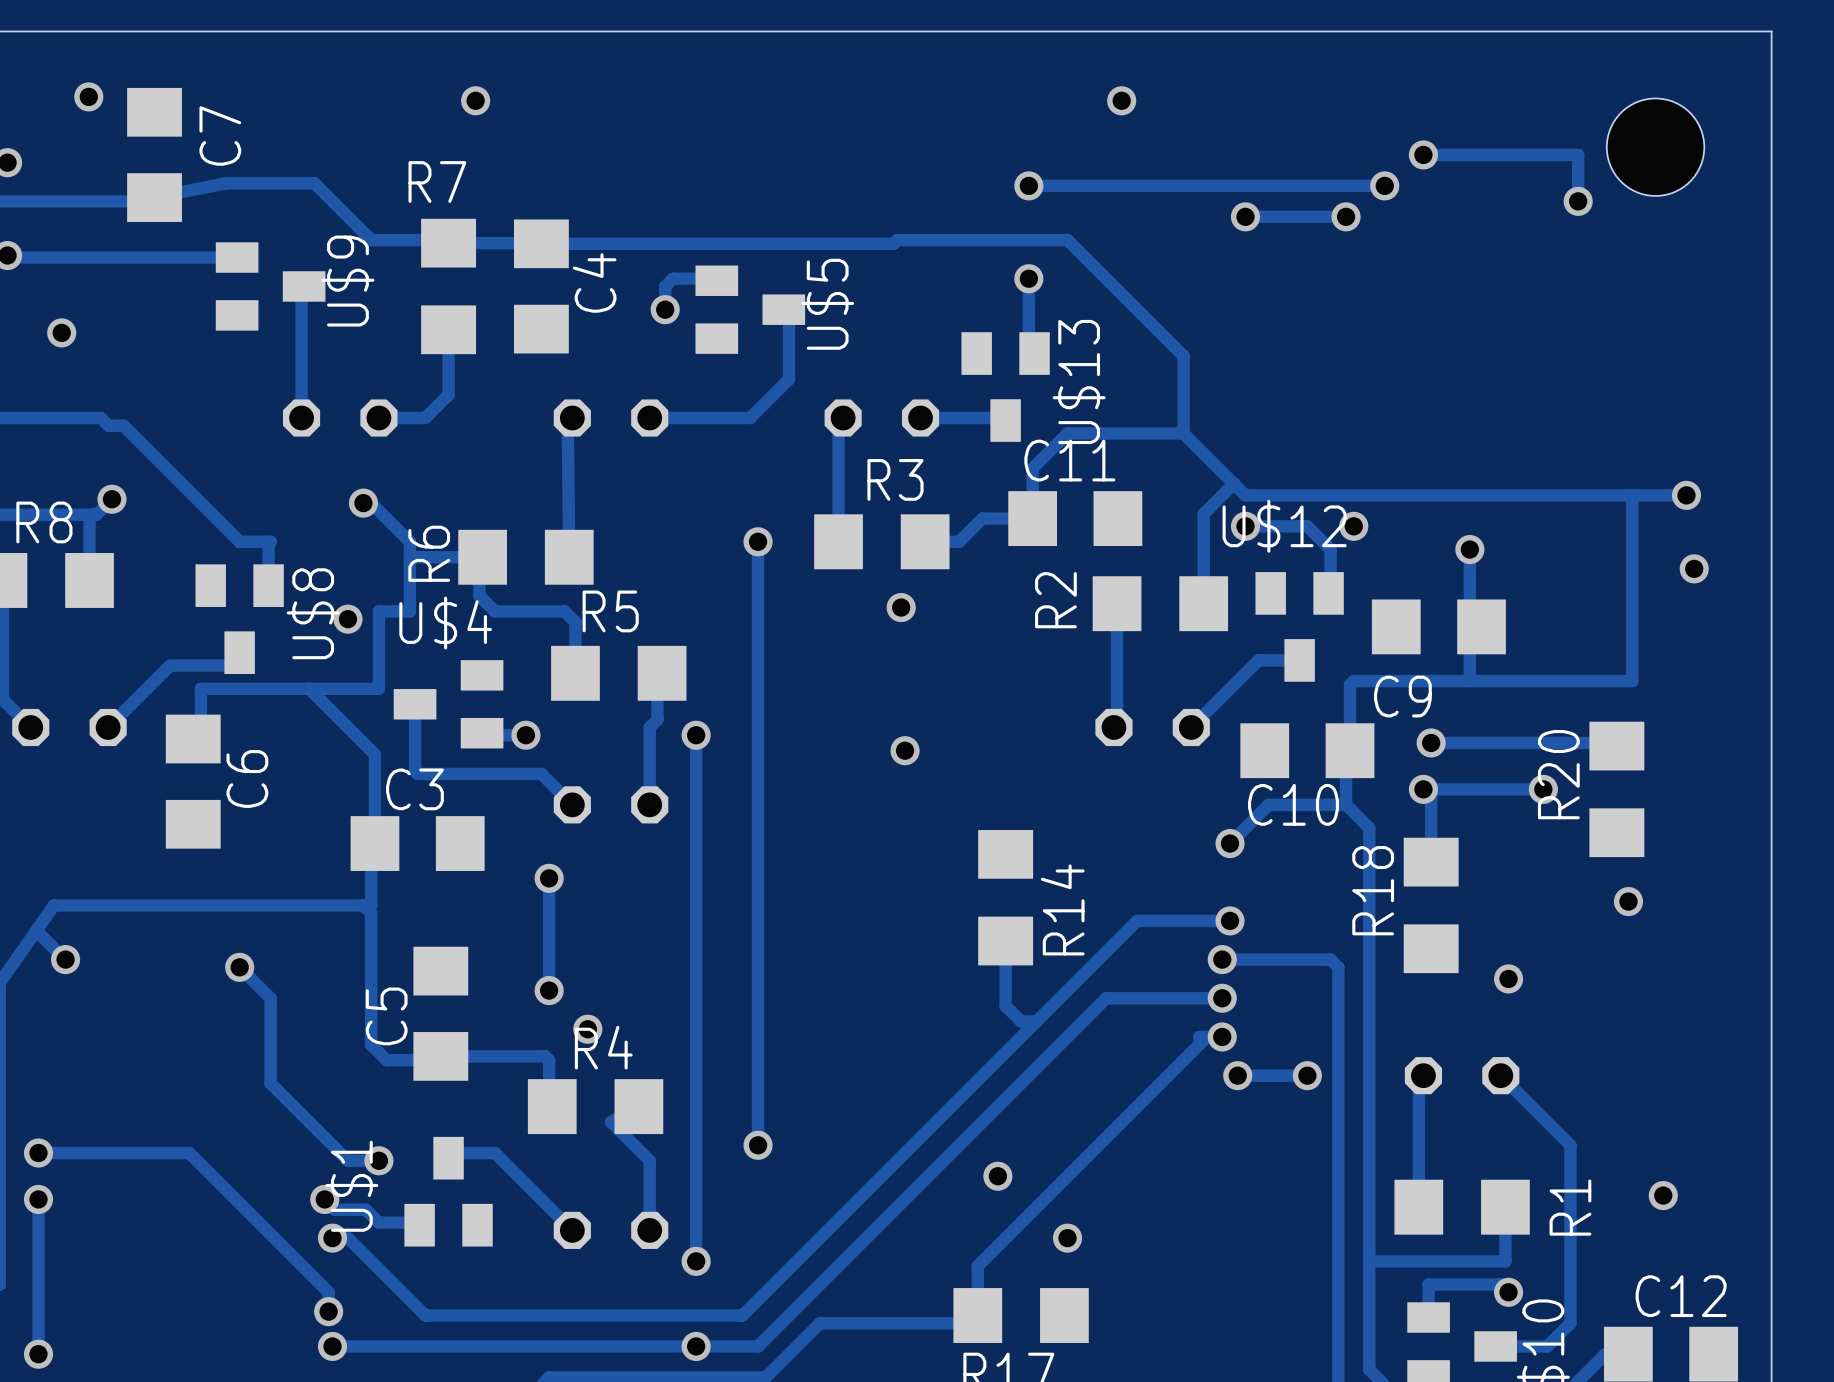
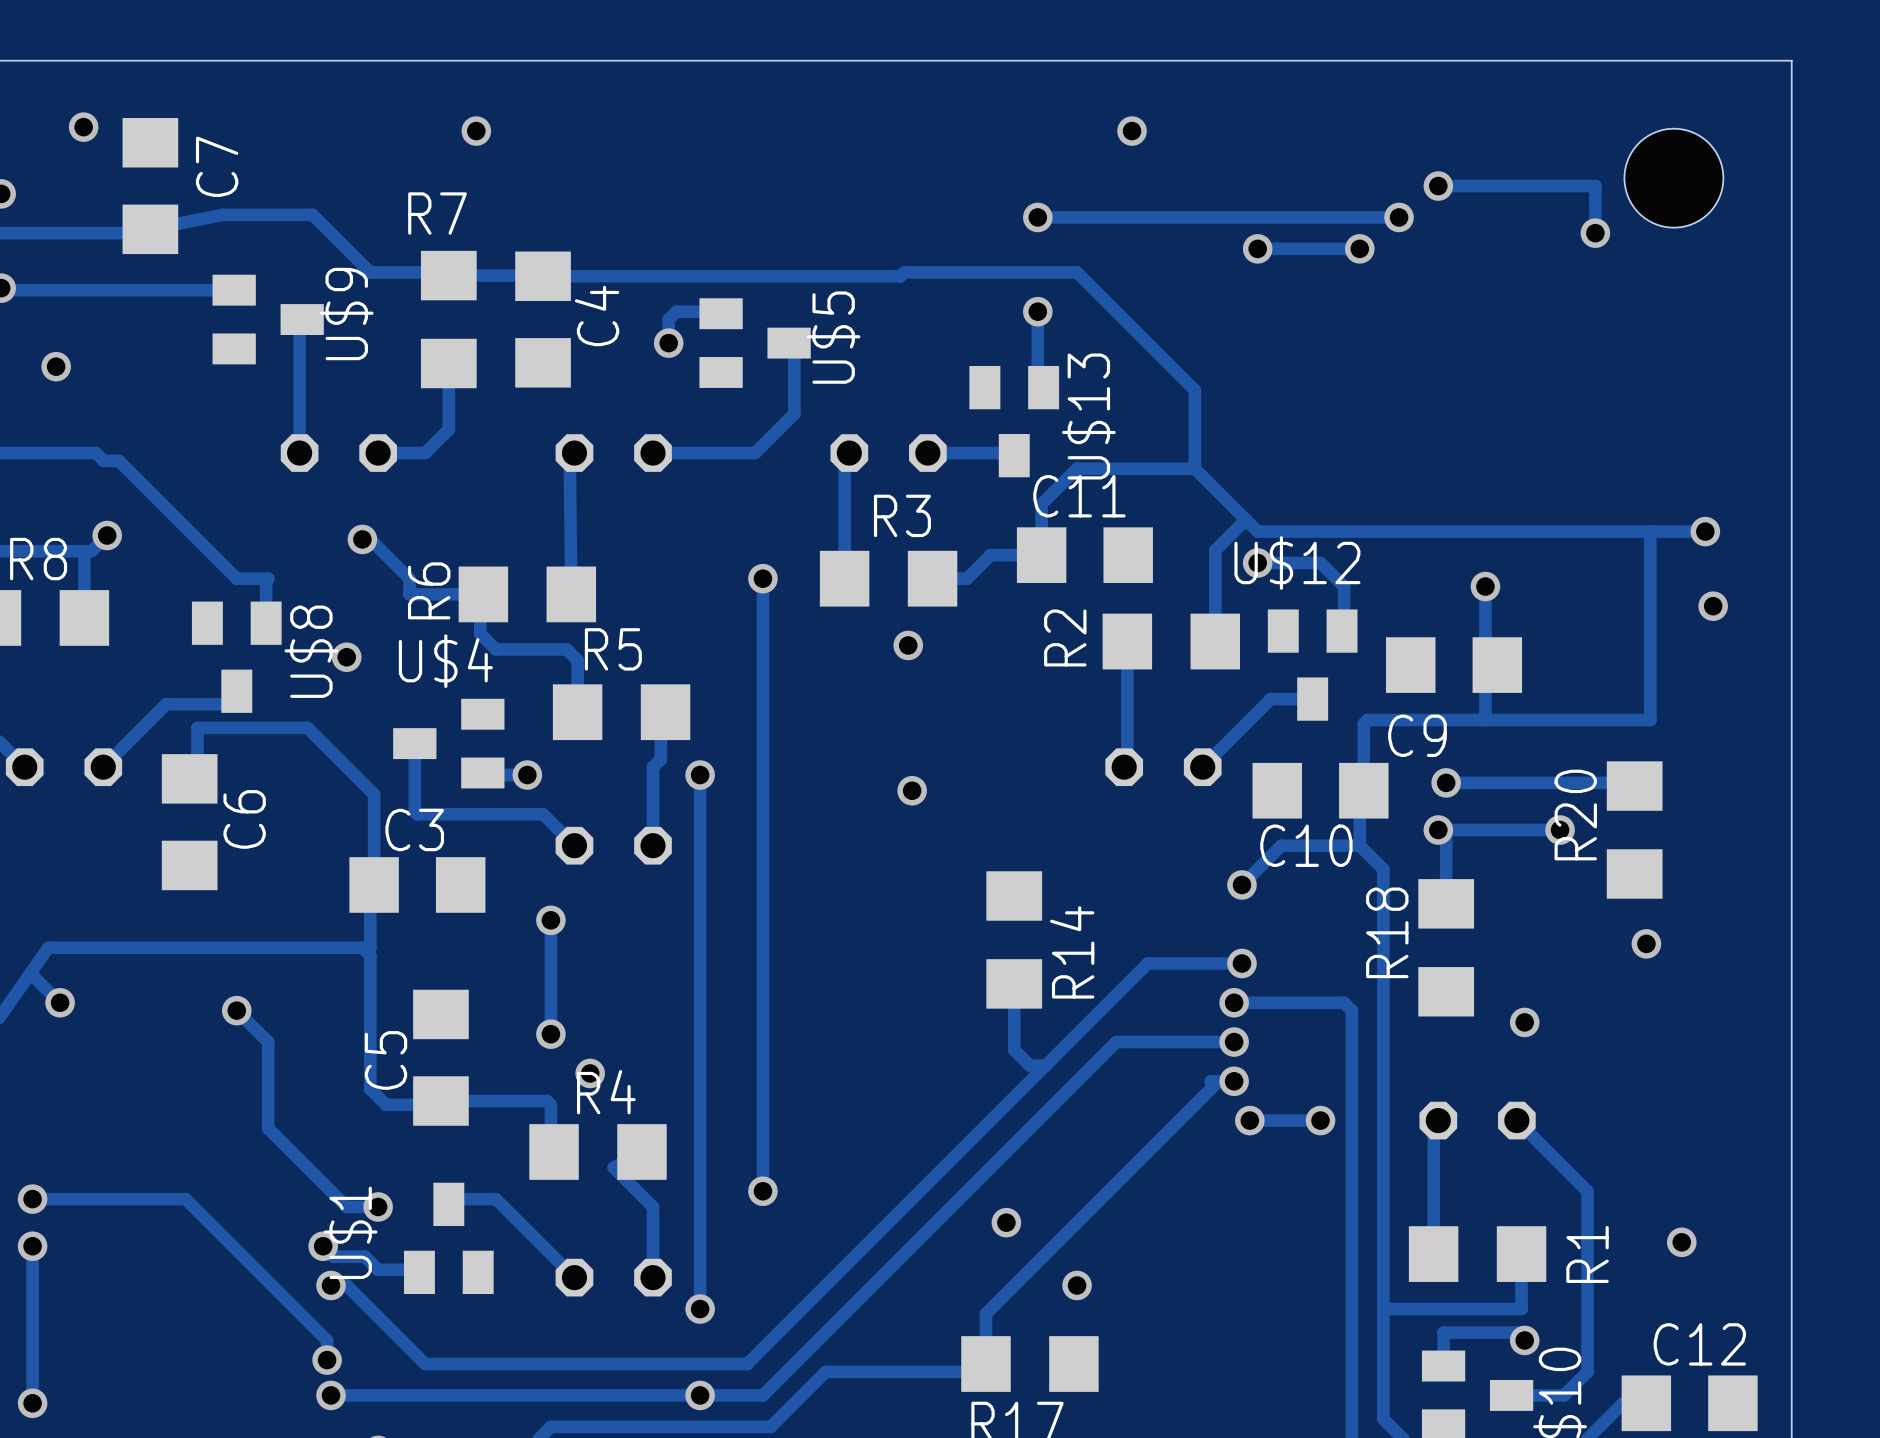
via: (1353, 526) -> none
track: (409, 557) (409, 611) (378, 611) (378, 688) (309, 688) -> none

